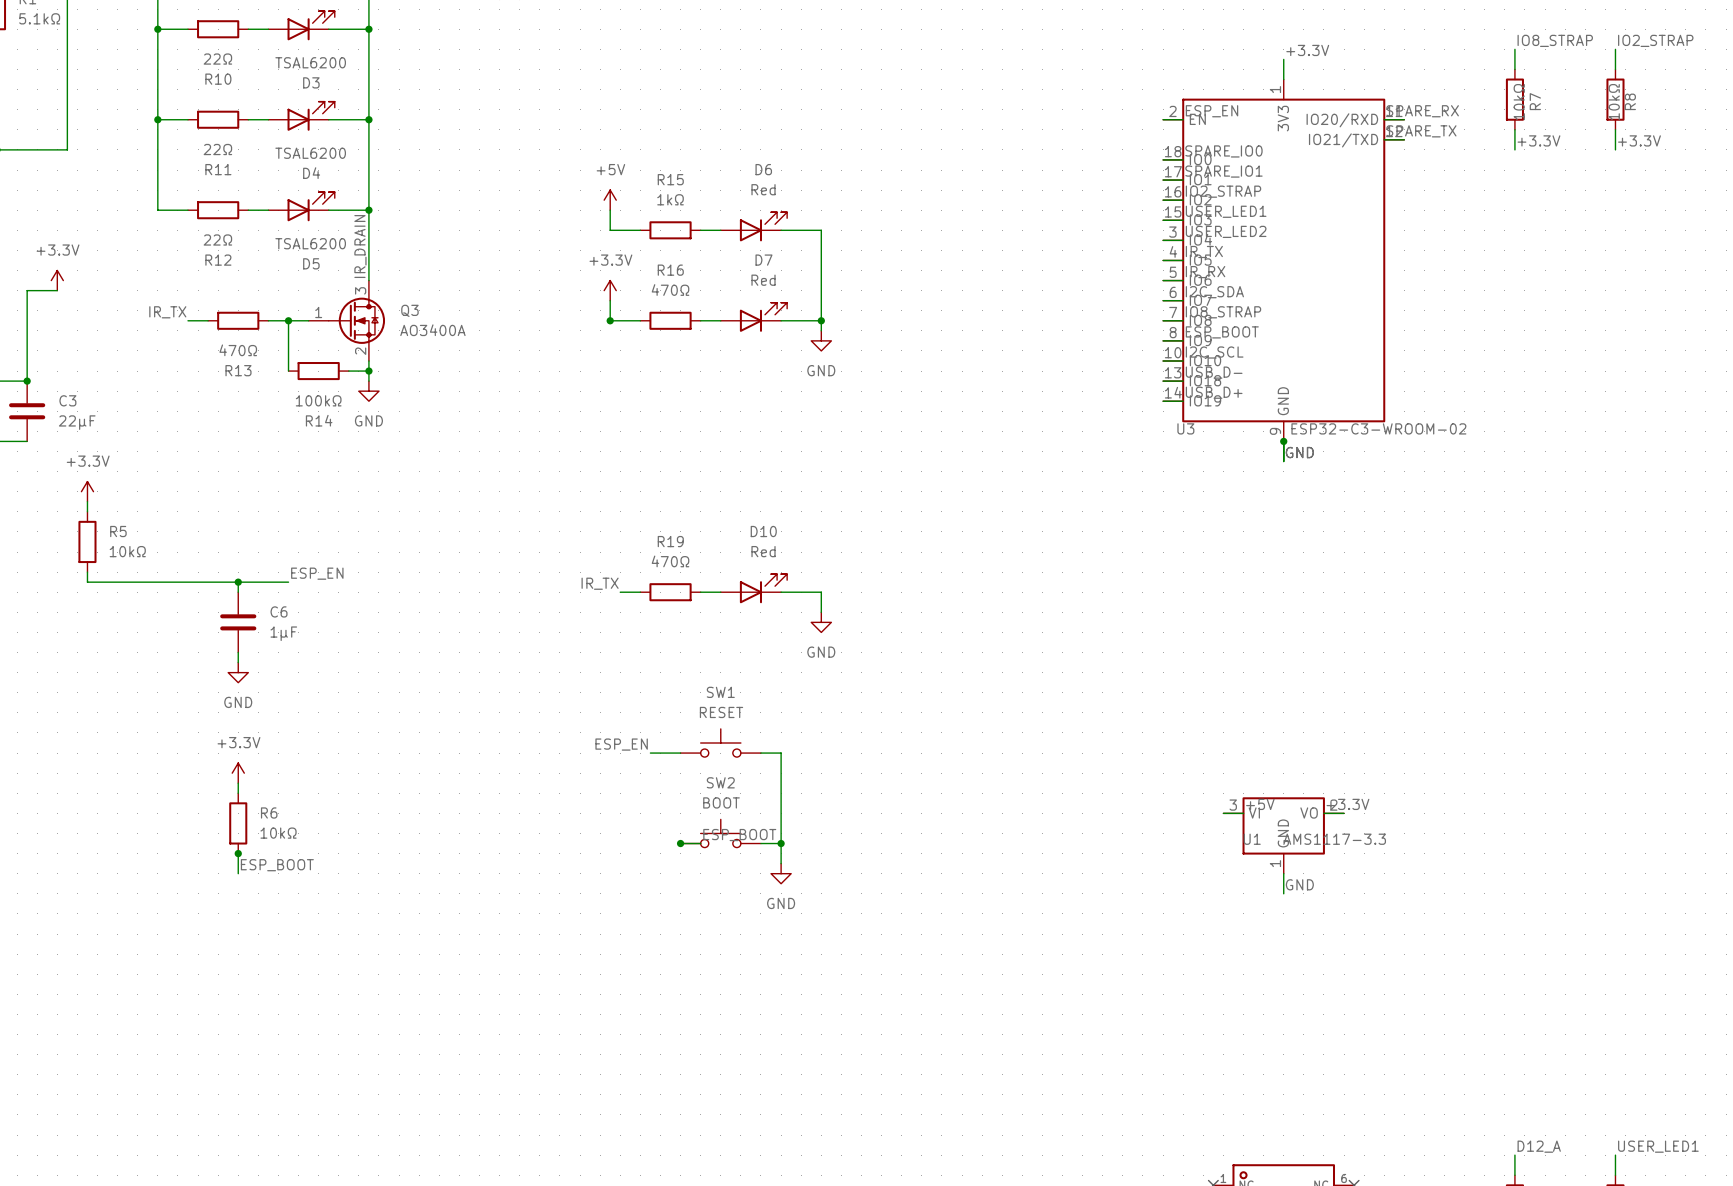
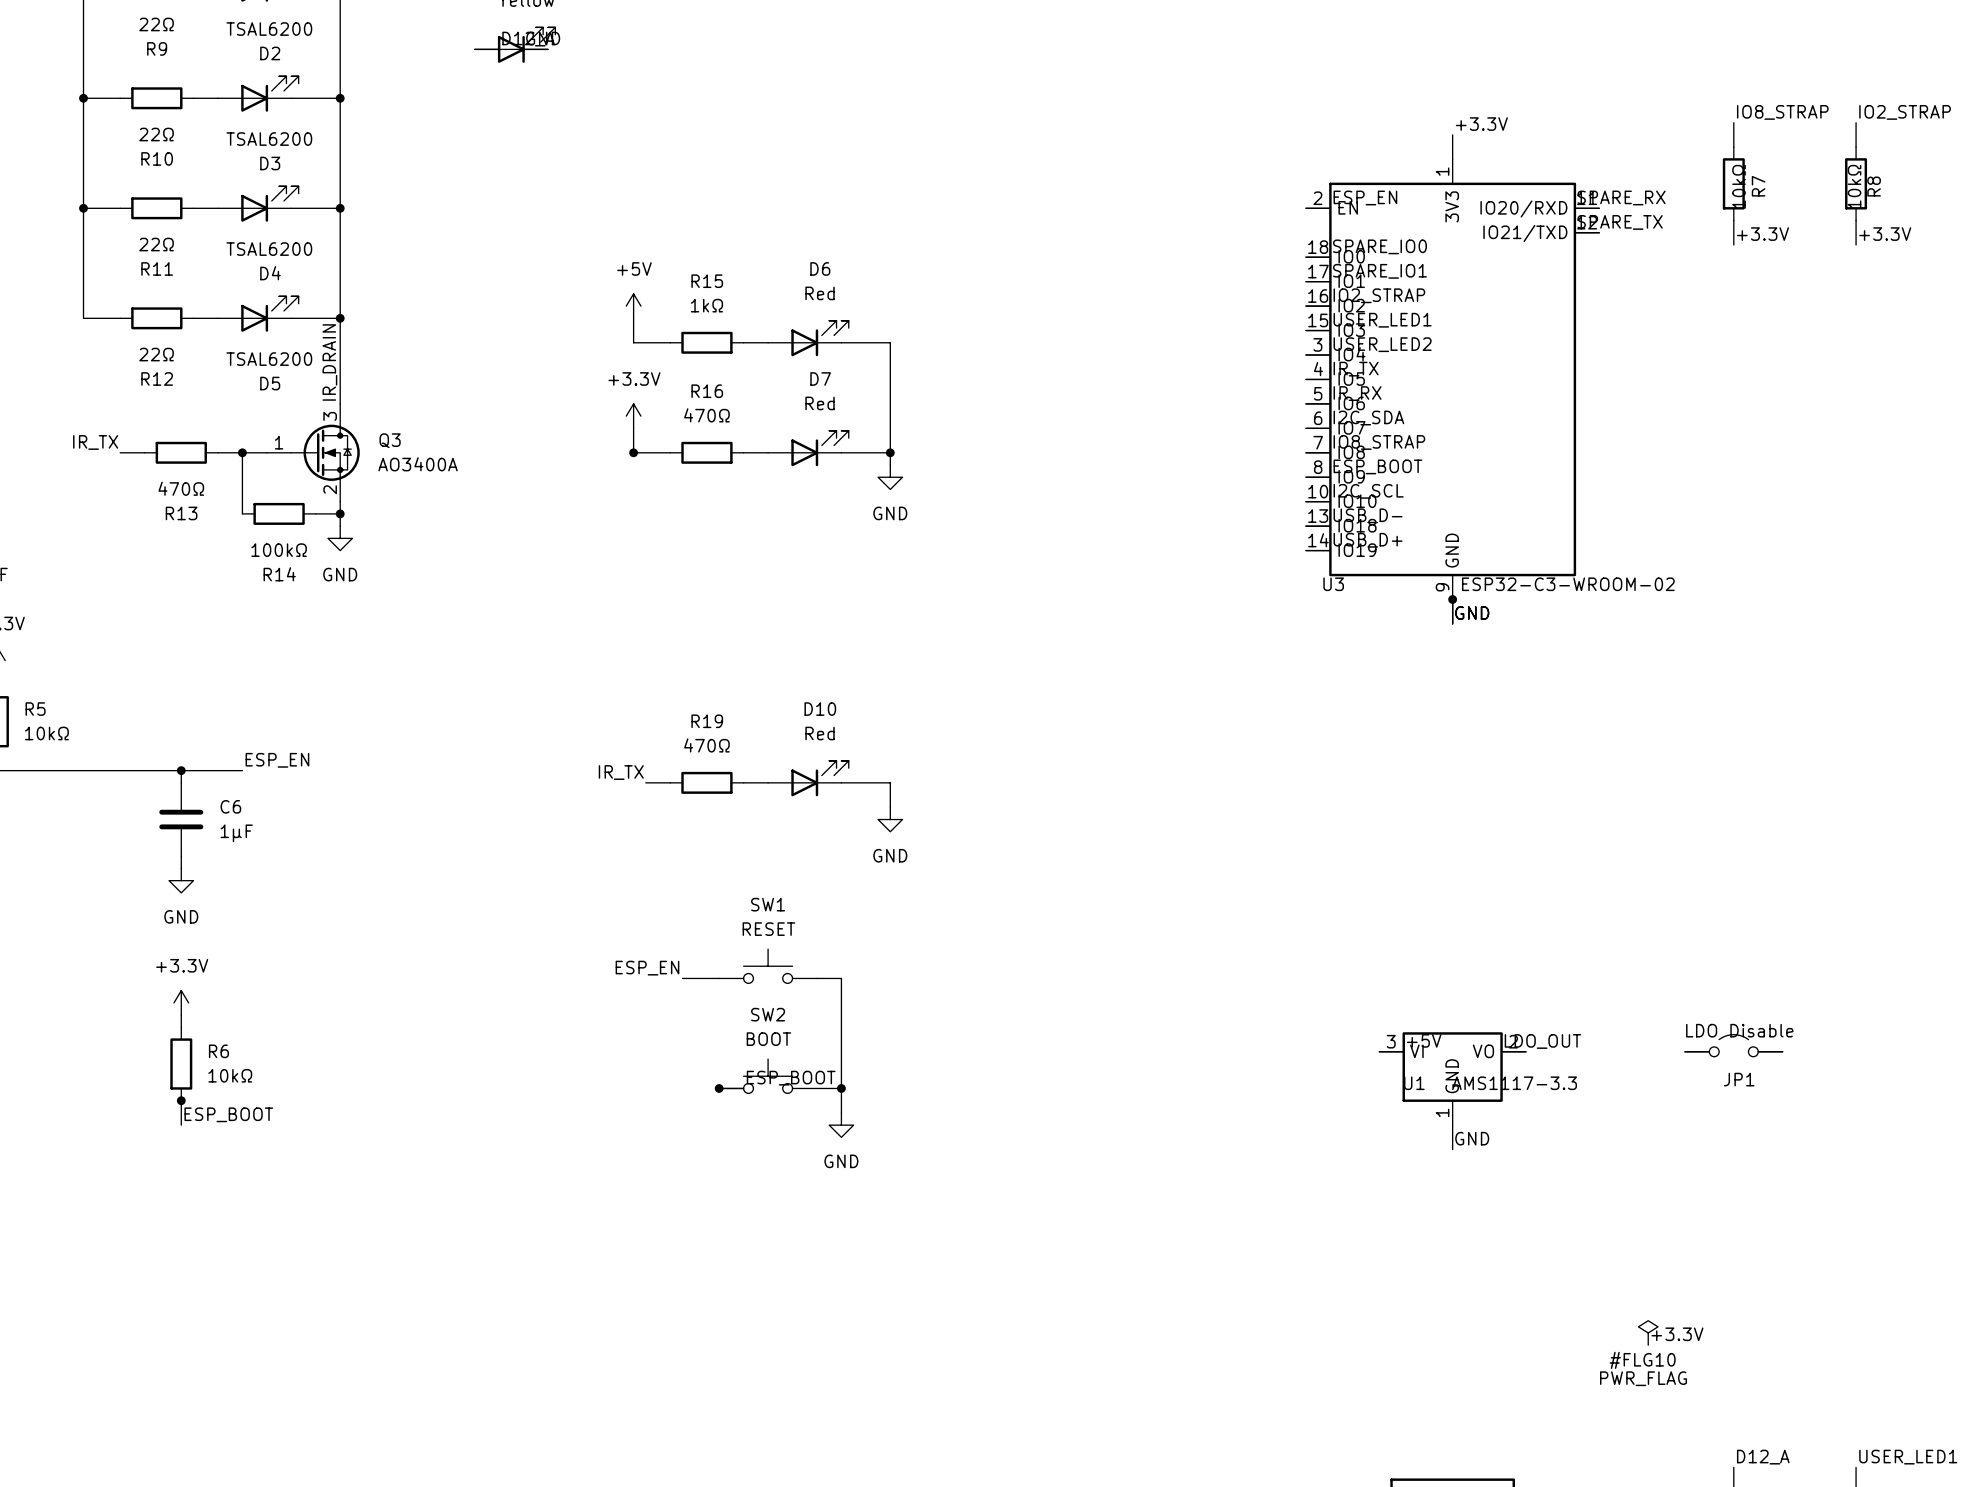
label: +3.3V (1347, 804) -> LDO_OUT (1542, 1041)
JP1: none -> LDO Disable (1733, 1045)
#FLG10: none -> PWR_FLAG (1648, 1332)
label: none -> +3.3V (1677, 1334)

